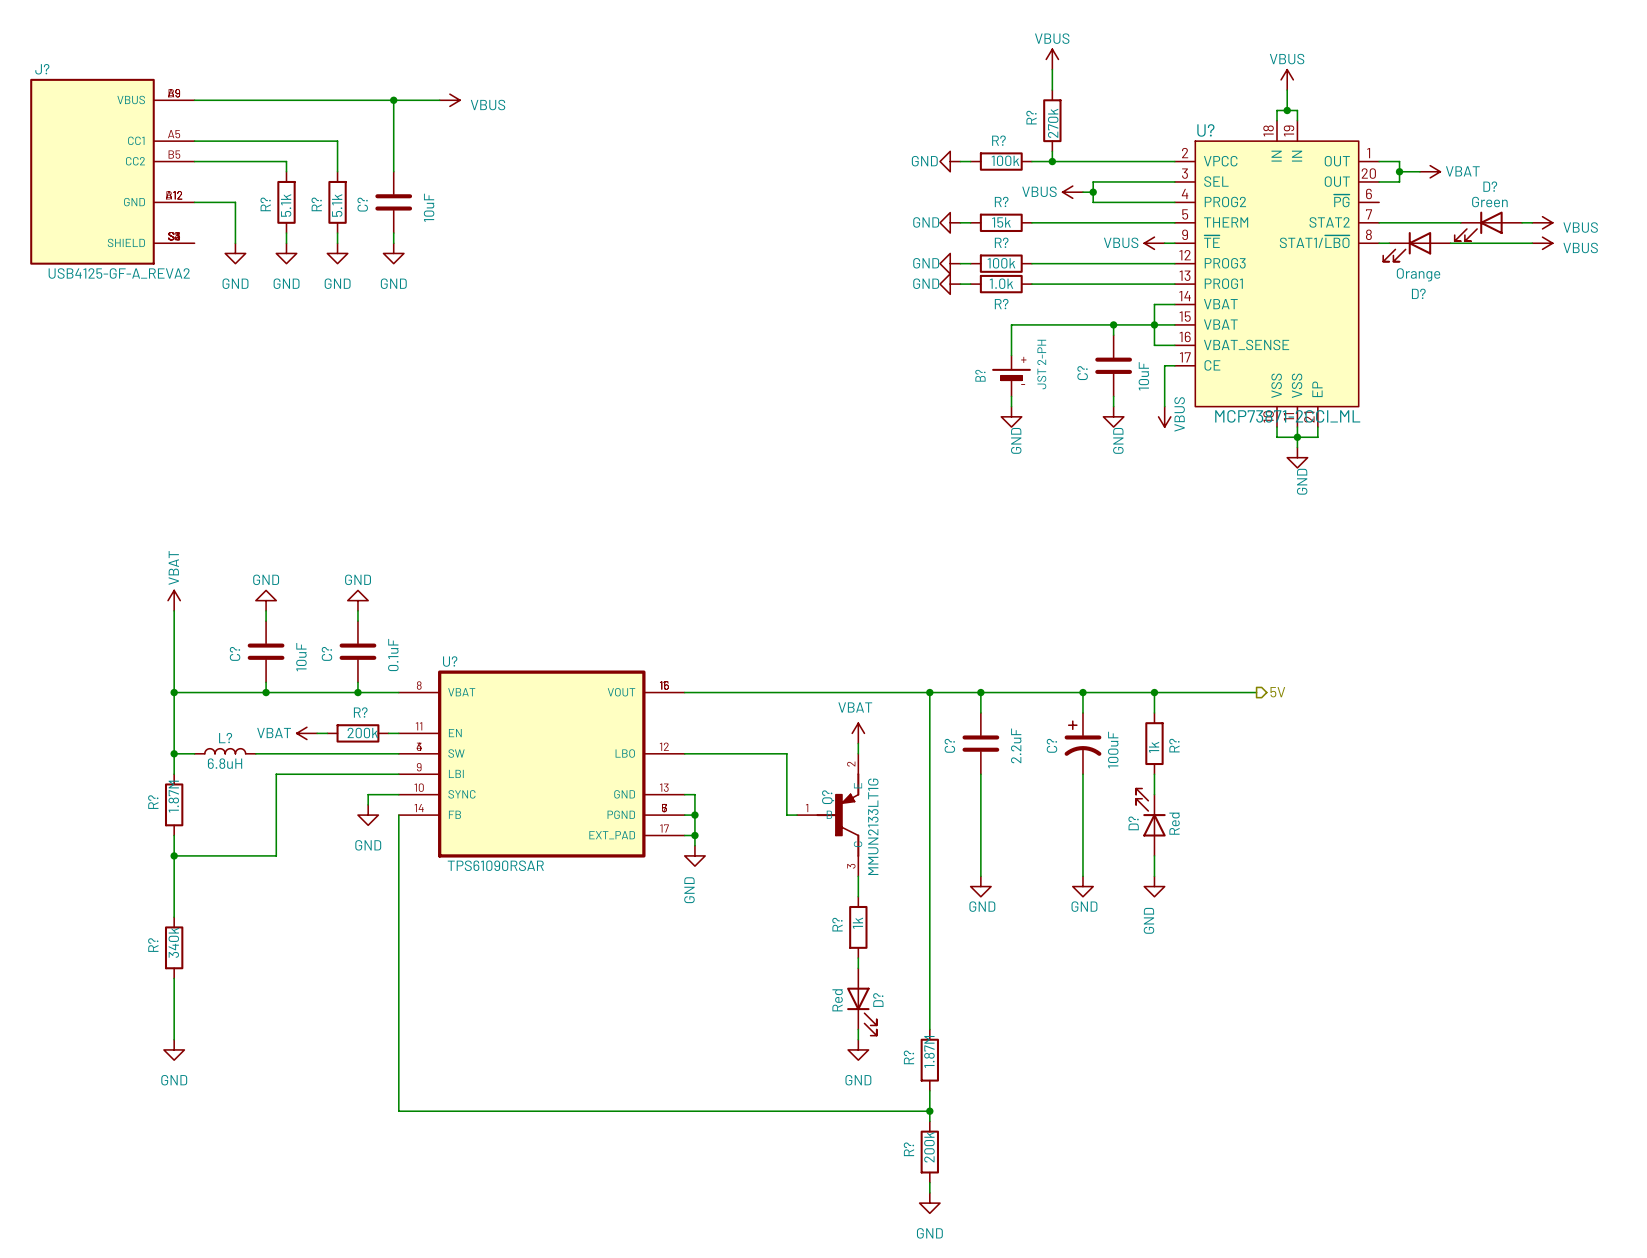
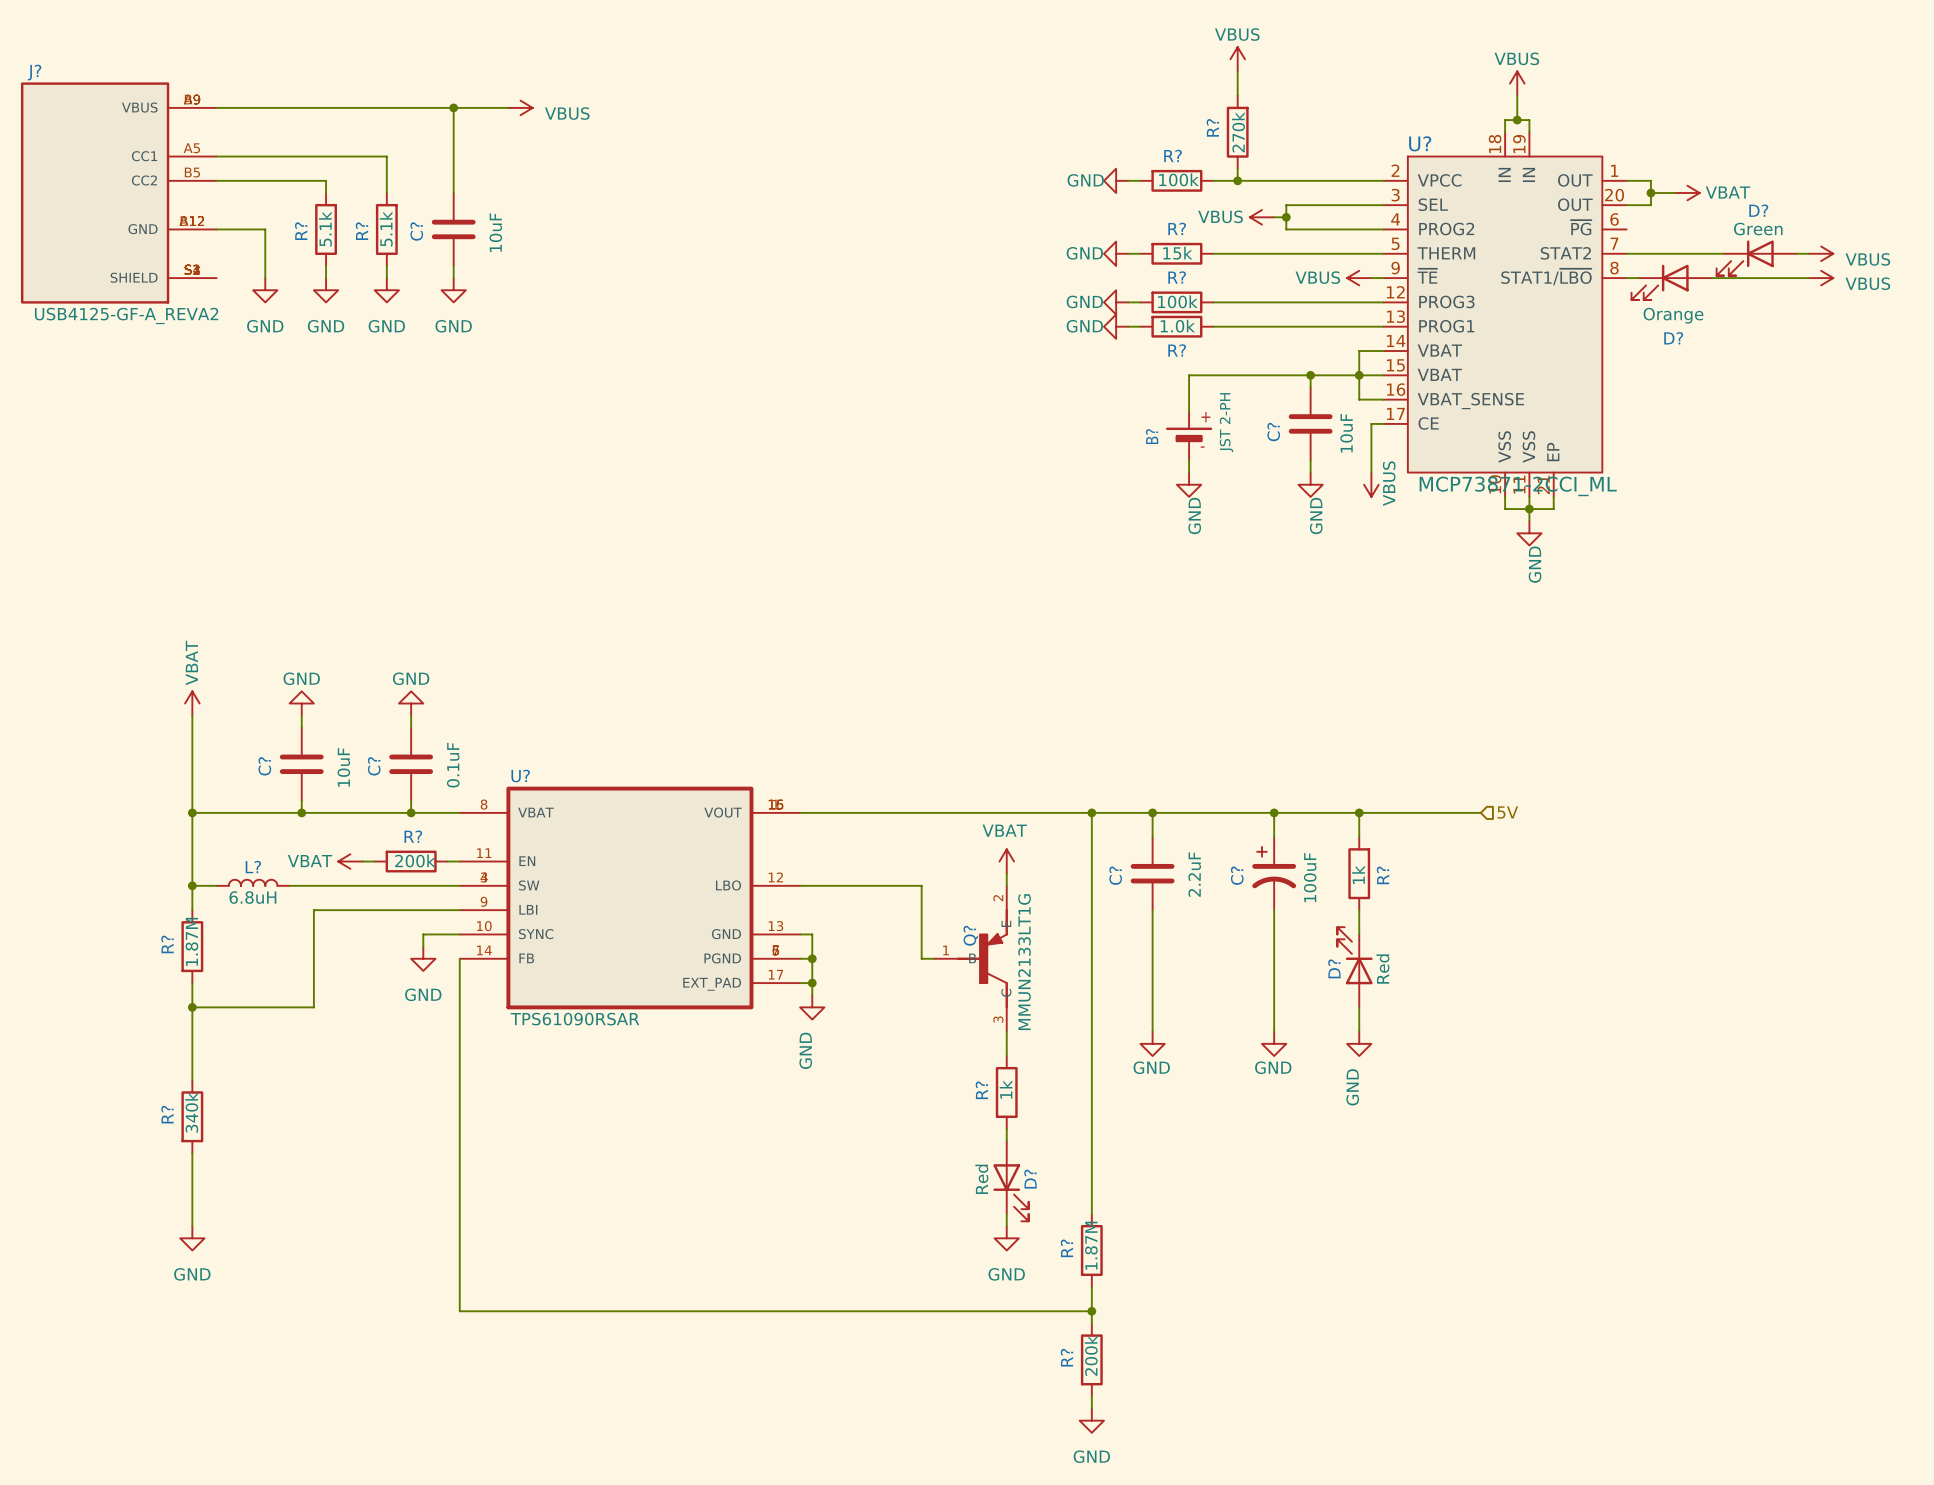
hierarchical label shape: output (1277, 692) -> input (1507, 812)

